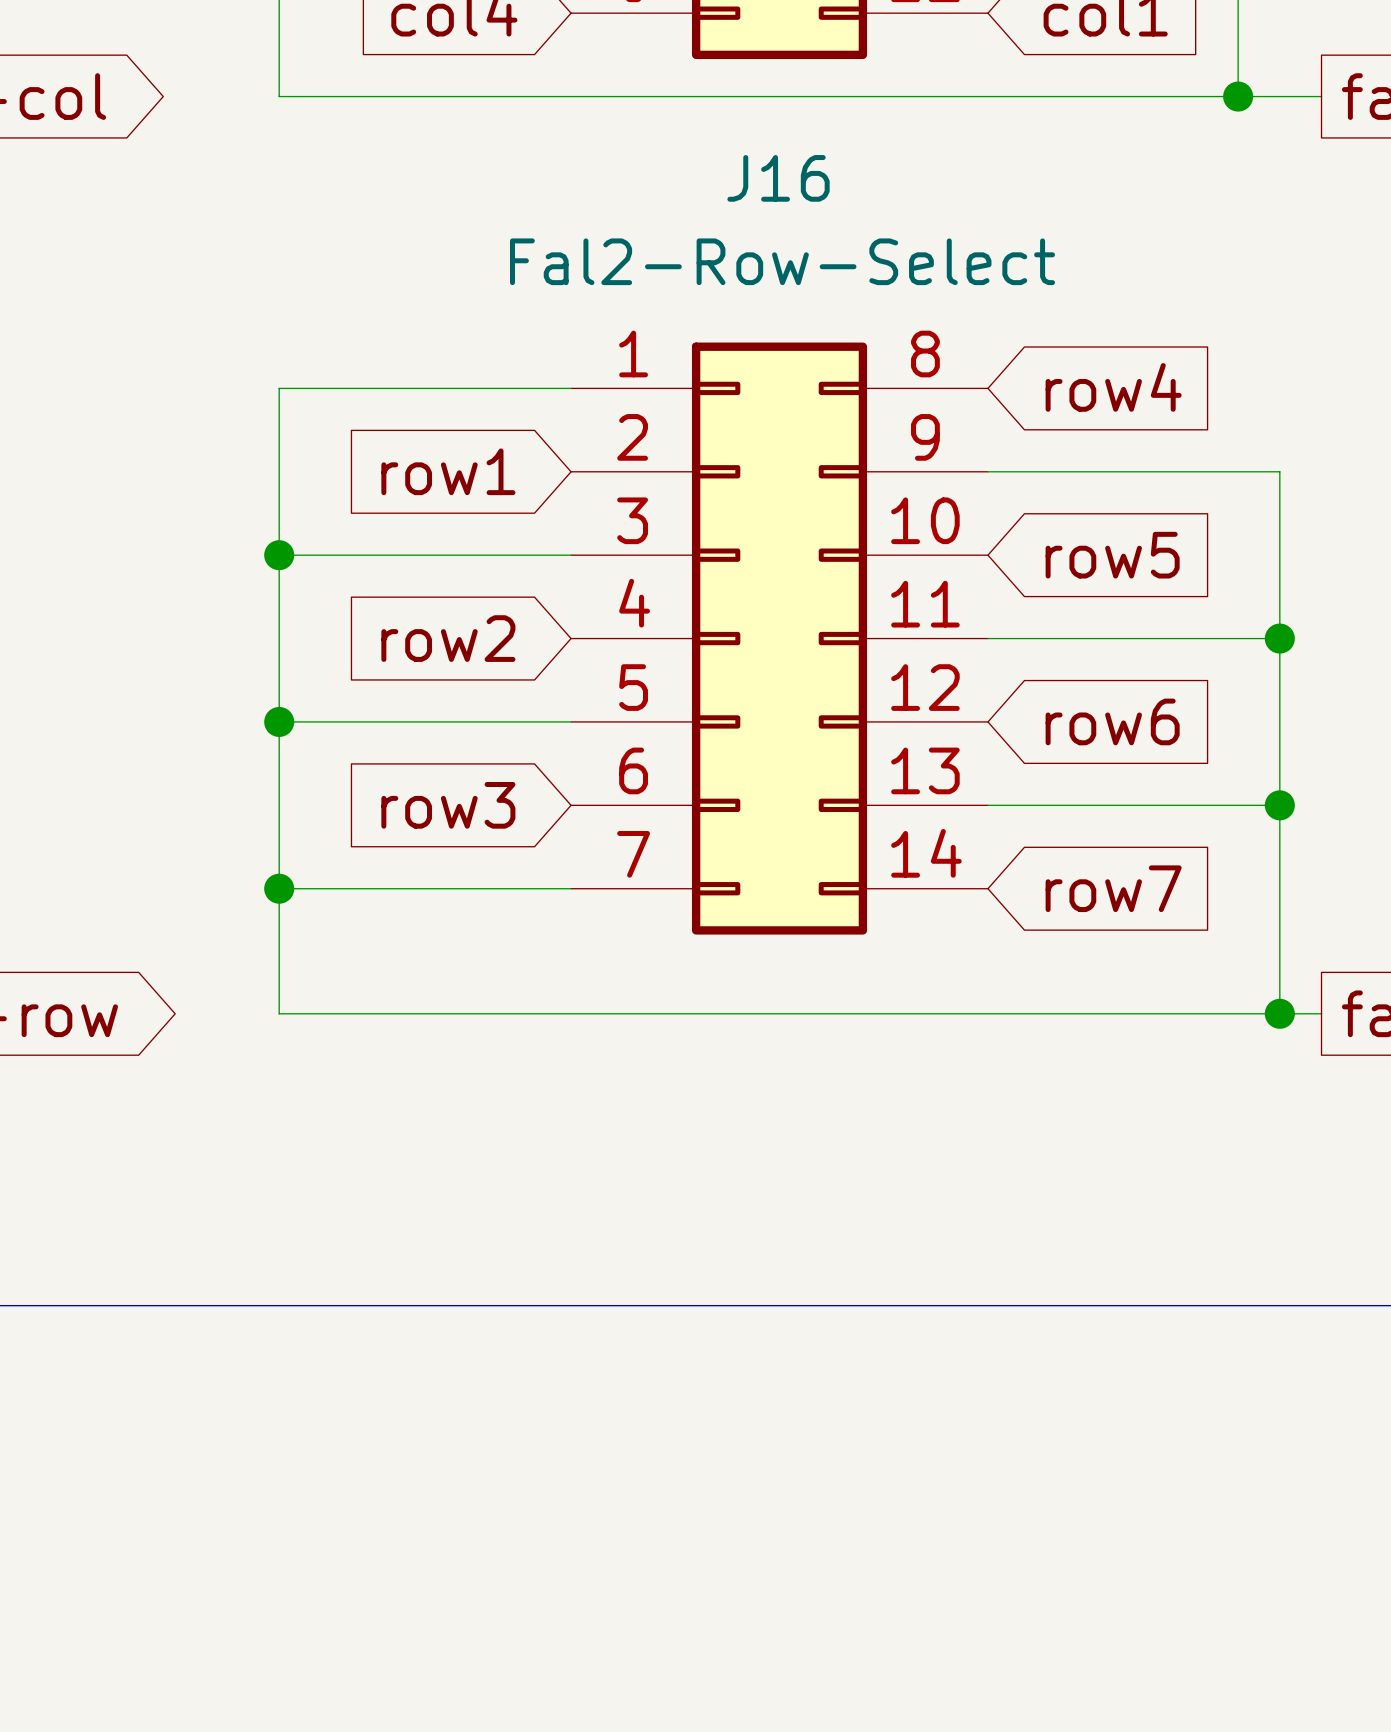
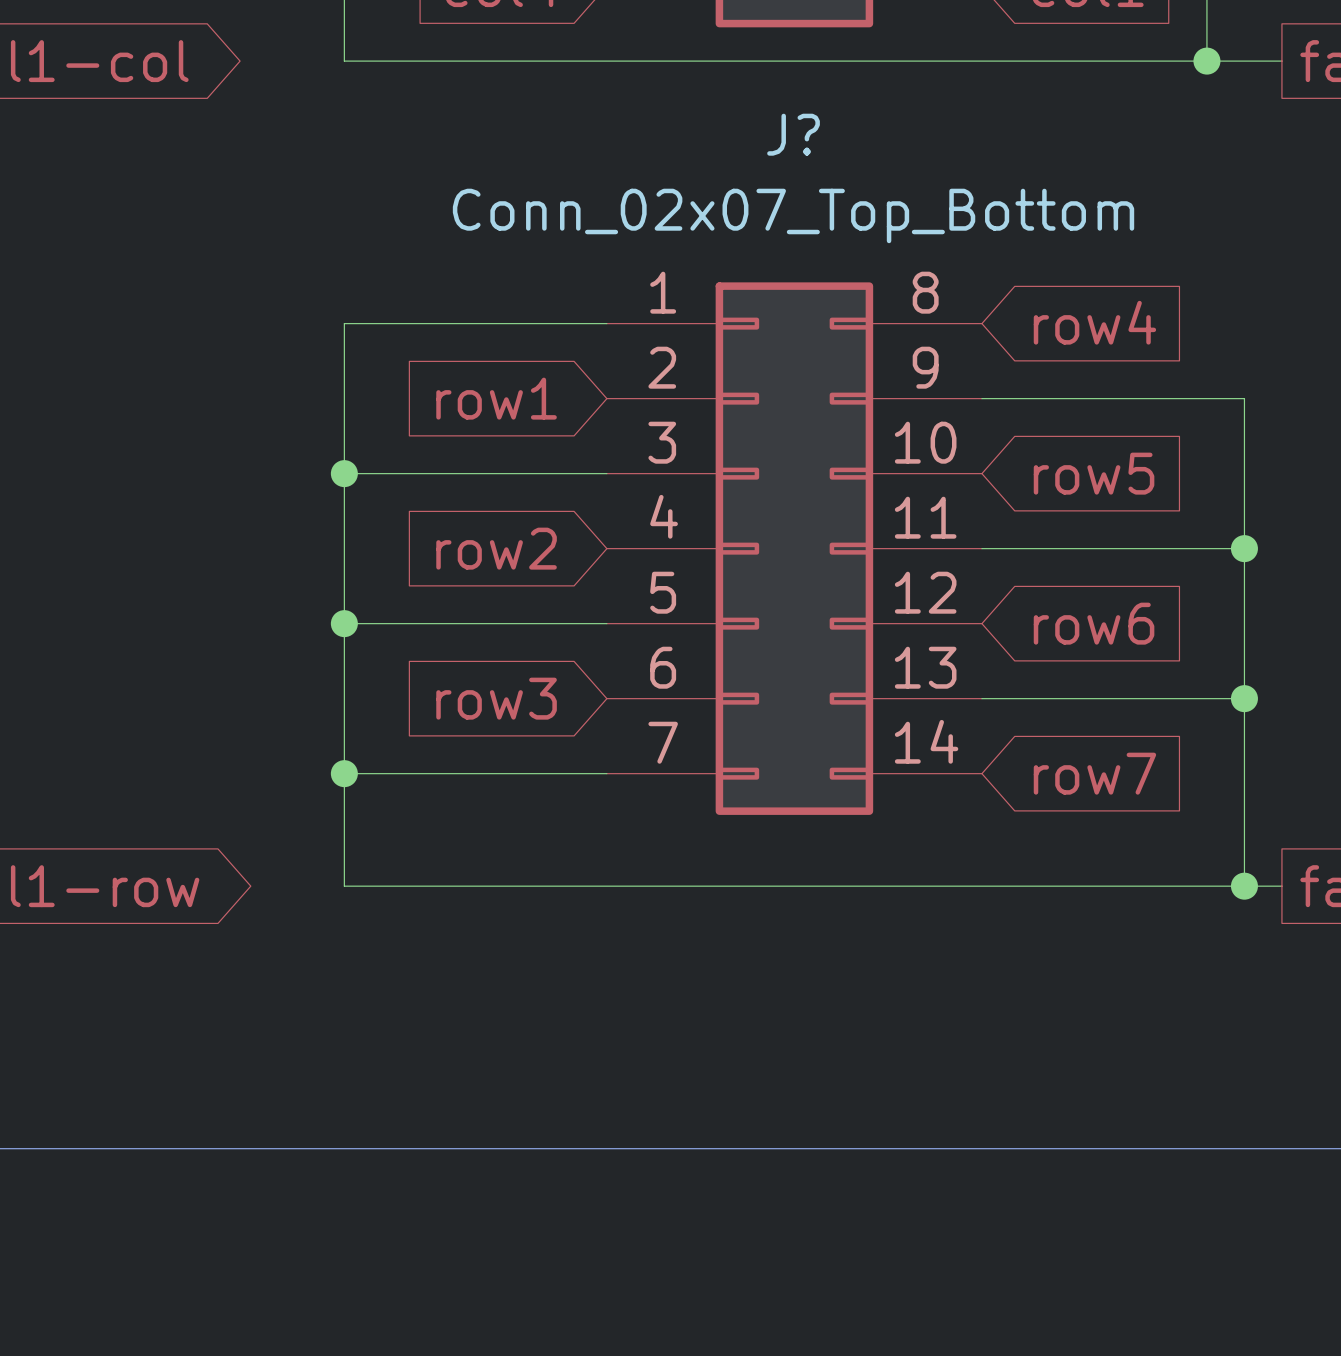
J16 name: J16 (778, 178) -> J? (793, 134)
J16 value: Fal2-Row-Select (782, 261) -> Conn_02x07_Top_Bottom (793, 215)

